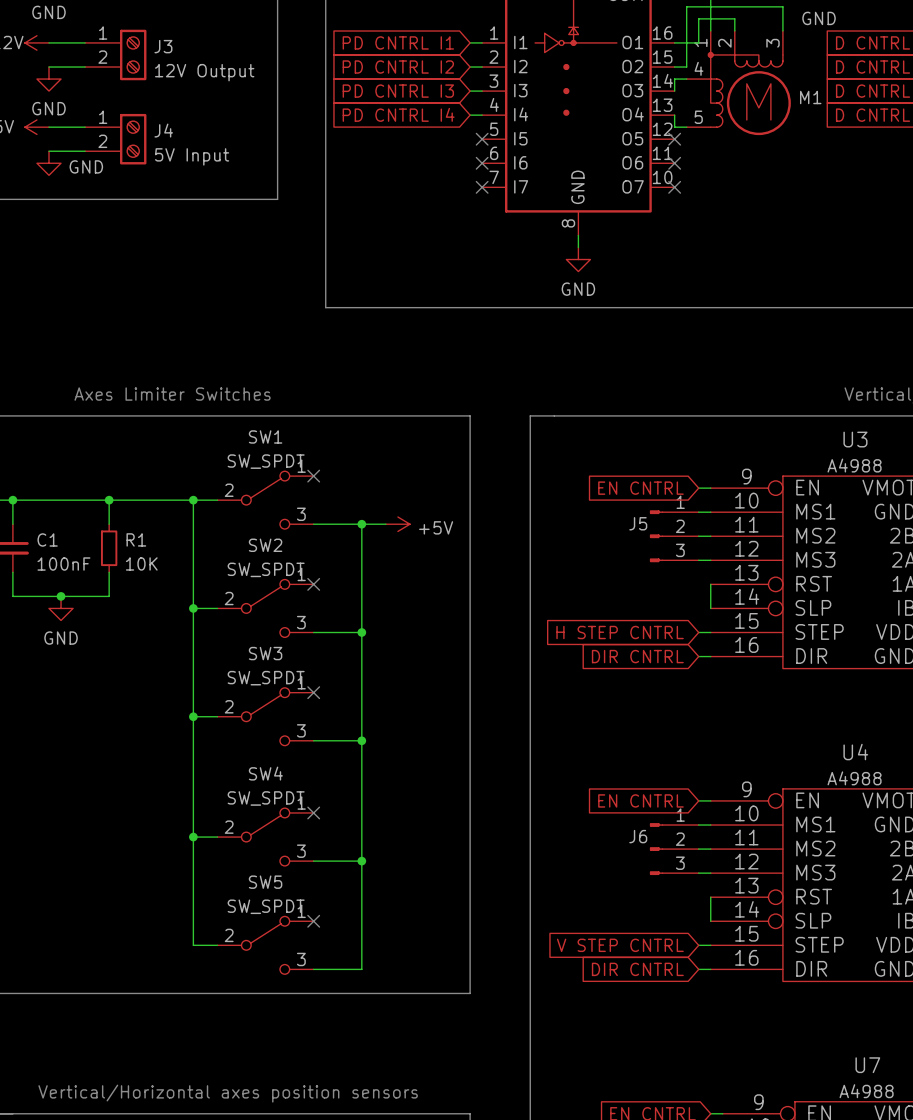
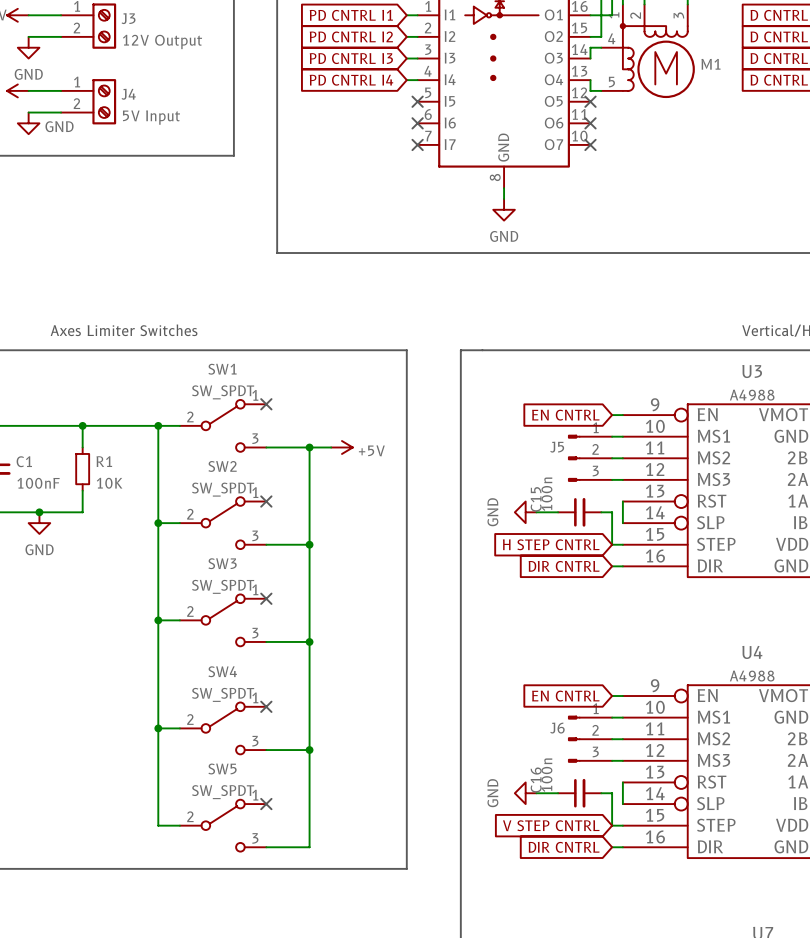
power symbol: none -> GND (525, 512)
wire: none -> (536, 512) (558, 512)
C15: none -> 100n (579, 512)
wire: none -> (601, 512) (612, 512) (612, 544)
power symbol: none -> GND (525, 793)
wire: none -> (536, 793) (558, 793)
C16: none -> 100n (579, 793)
wire: none -> (601, 793) (612, 793) (612, 825)

